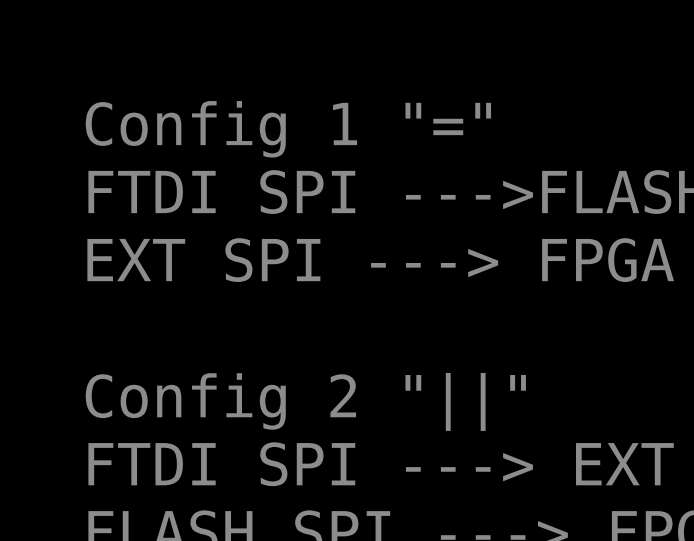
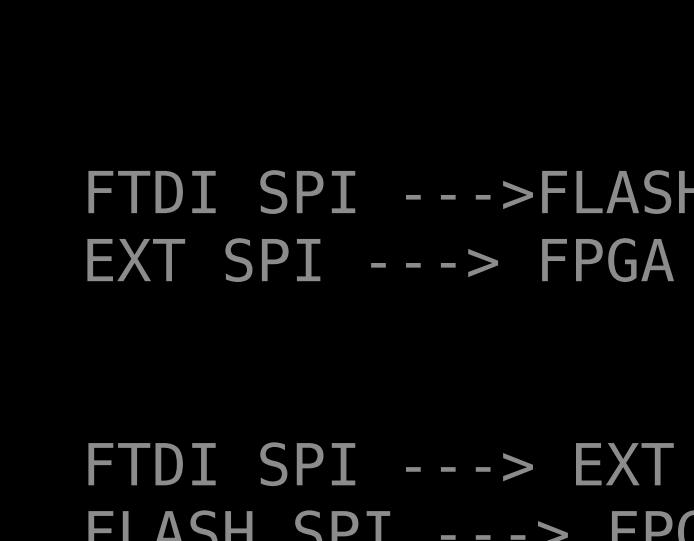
text: Config 1 "=" (288, 129) -> none
text: Config 2 "||" (305, 401) -> none

